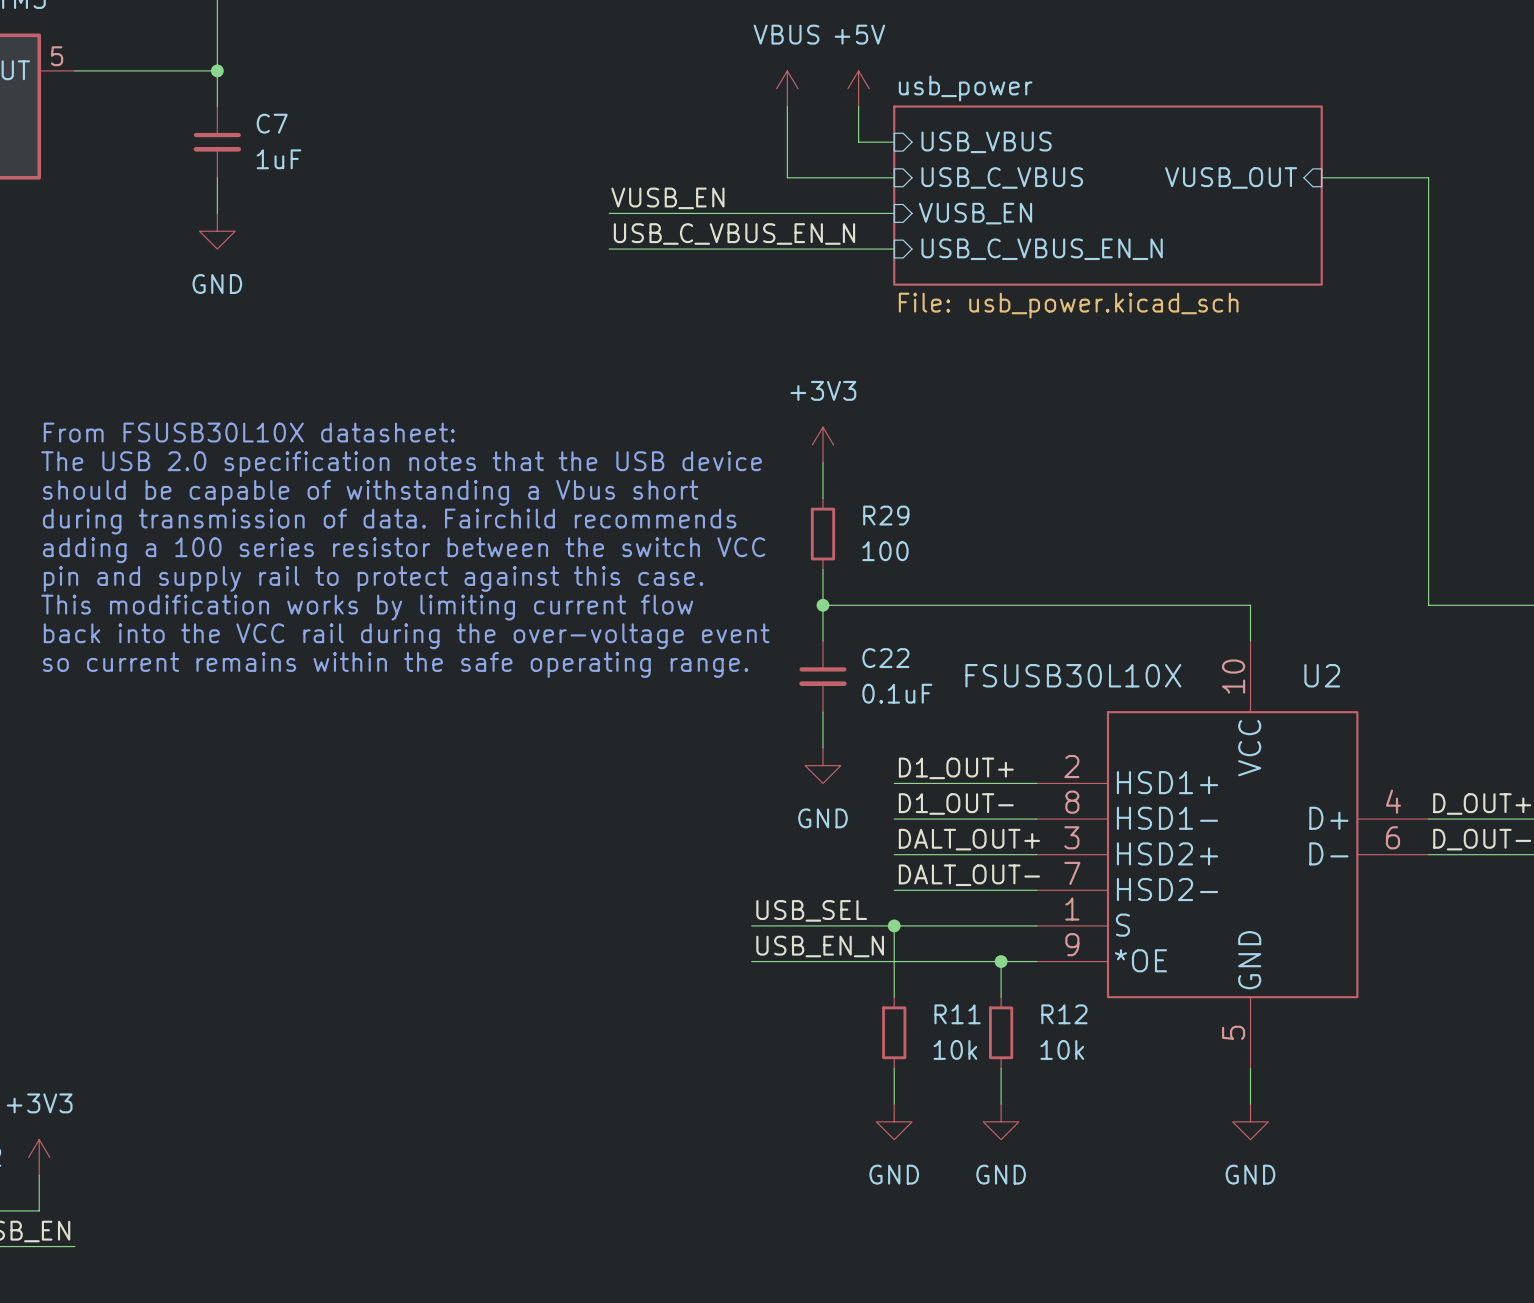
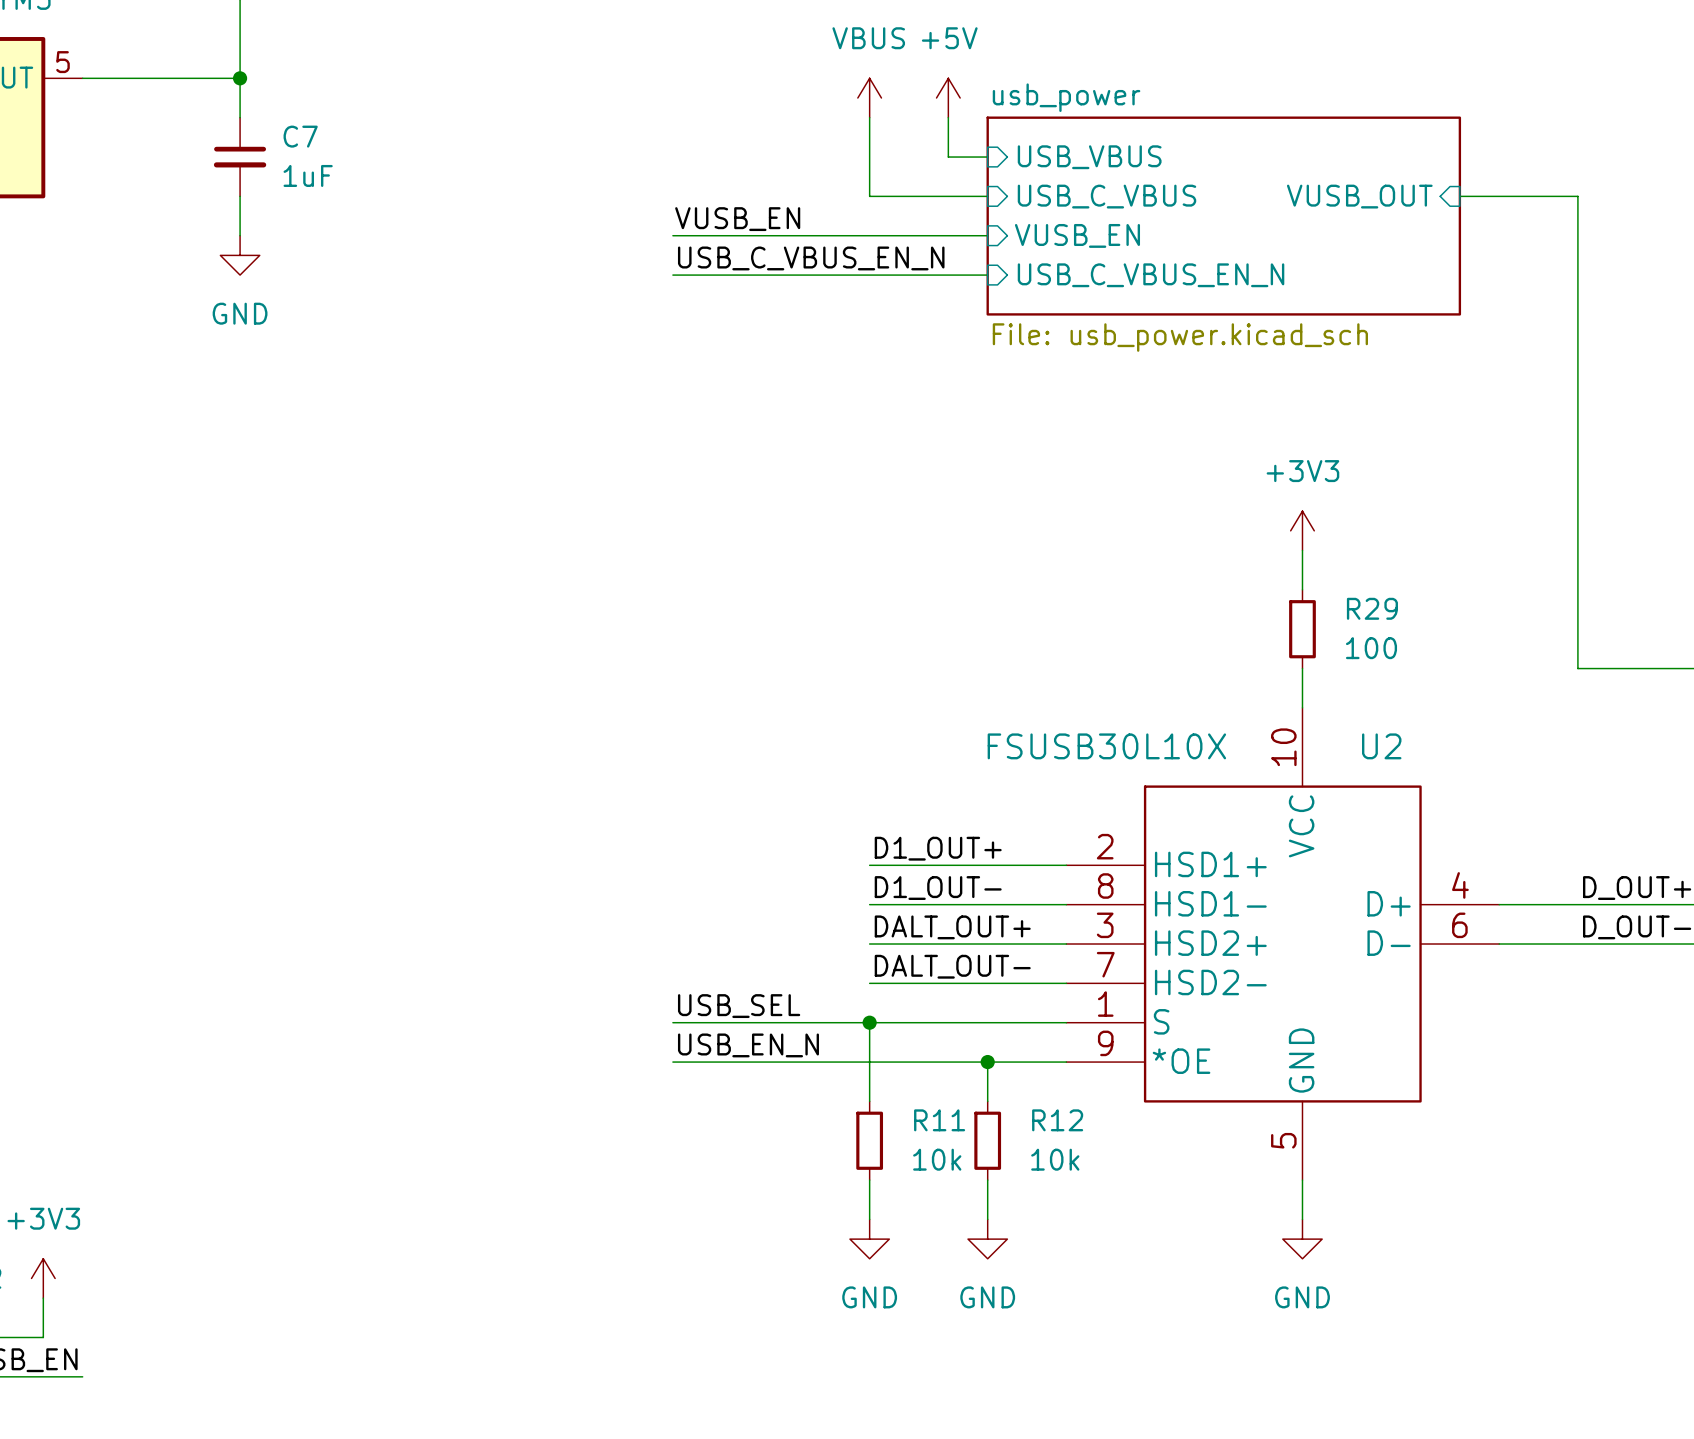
text: From FSUSB30L10X datasheet: (249, 432) -> none
power symbol: +3V3 (822, 444) -> none
wire: (822, 462) (822, 498) -> none
text: The USB 2.0 specification notes that the USB device (401, 464) -> none
power symbol: none -> +3V3 (1302, 530)
text: should be capable of withstanding a Vbus short (370, 492) -> none
wire: none -> (1302, 550) (1302, 589)
text: during transmission of data. Fairchild recommends (389, 521) -> none
R29 position: (822, 534) -> (1302, 629)
text: adding a 100 series resistor between the switch VCC (404, 550) -> none
wire: (822, 569) (822, 640) -> none
text: pin and supply rail to protect against this case. (373, 578) -> none
wire: (822, 605) (1250, 605) (1250, 640) -> none
junction: (822, 605) -> none
wire: none -> (1302, 668) (1302, 707)
text: This modification works by limiting current flow (367, 607) -> none
text: back into the VCC rail during the over-voltage event (406, 636) -> none
text: so current remains within the safe operating range. (395, 664) -> none
C22: 0.1uF (822, 676) -> none
wire: (822, 712) (822, 747) -> none
power symbol: GND (822, 765) -> none
label position: D1_OUT+ (956, 768) -> D1_OUT+ (938, 848)
wire: none -> (869, 865) (987, 865)
label position: D1_OUT- (956, 804) -> D1_OUT- (938, 888)
wire: none -> (869, 904) (987, 904)
label position: DALT_OUT+ (969, 839) -> DALT_OUT+ (952, 927)
wire: none -> (869, 944) (987, 944)
U2 position: (1232, 854) -> (1282, 944)
label position: DALT_OUT- (969, 875) -> DALT_OUT- (952, 966)
wire: none -> (869, 983) (987, 983)
label position: USB_SEL (811, 910) -> USB_SEL (739, 1006)
wire: none -> (672, 1022) (830, 1022)
wire: none -> (869, 1022) (869, 1101)
junction: none -> (869, 1022)
wire: (894, 925) (894, 961) -> (869, 1180) (869, 1219)
junction position: (894, 925) -> (987, 1062)
label position: USB_EN_N (820, 946) -> USB_EN_N (748, 1045)
wire: none -> (672, 1062) (830, 1062)
wire: (1001, 961) (1001, 997) -> none
junction: (1001, 961) -> none
R11 name: R11 (957, 1014) -> R12 (1057, 1120)
R11: none -> 10k (869, 1140)
R12: 10k (1001, 1032) -> none
wire: (1001, 1068) (1001, 1104) -> none
wire: (1250, 1068) (1250, 1104) -> (1302, 1180) (1302, 1219)
power symbol: none -> GND (869, 1239)
power symbol: GND (1001, 1121) -> none
power symbol position: GND (1250, 1121) -> GND (1302, 1239)

